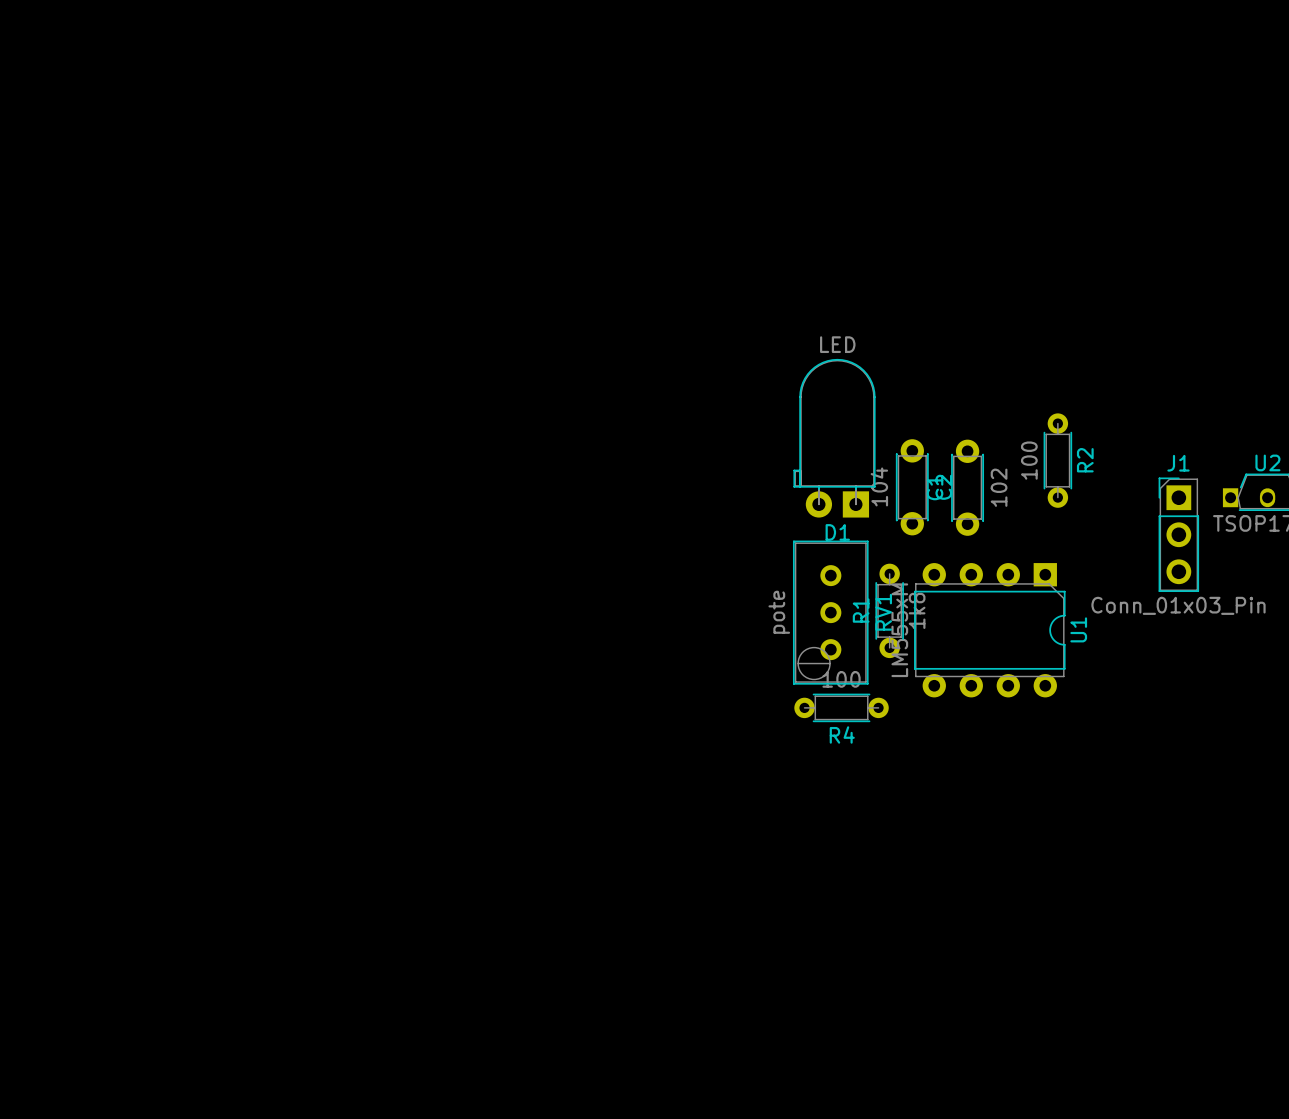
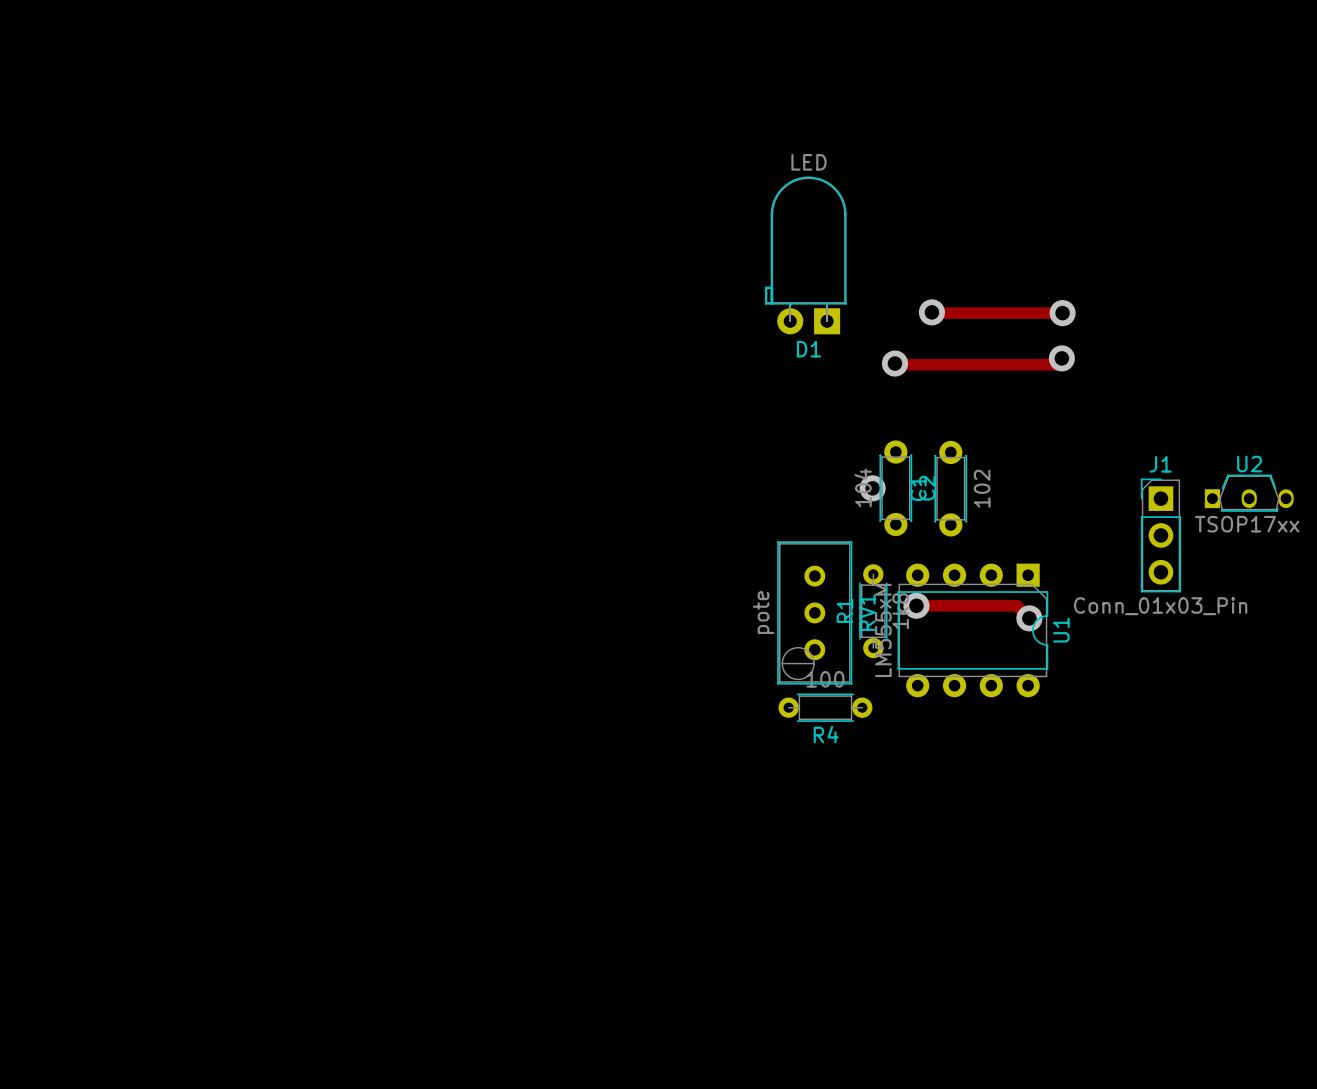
track: none -> (931, 312) (1062, 313)
via: none -> (931, 312)
via: none -> (1062, 313)
track: none -> (1061, 358) (1055, 364) (894, 363)
via: none -> (1061, 358)
via: none -> (894, 363)
D1 position: (834, 438) -> (805, 255)
R2: 100 (1057, 460) -> none
via: none -> (872, 488)
track: none -> (916, 605) (1016, 605) (1029, 618)
via: none -> (916, 605)
via: none -> (1029, 618)

